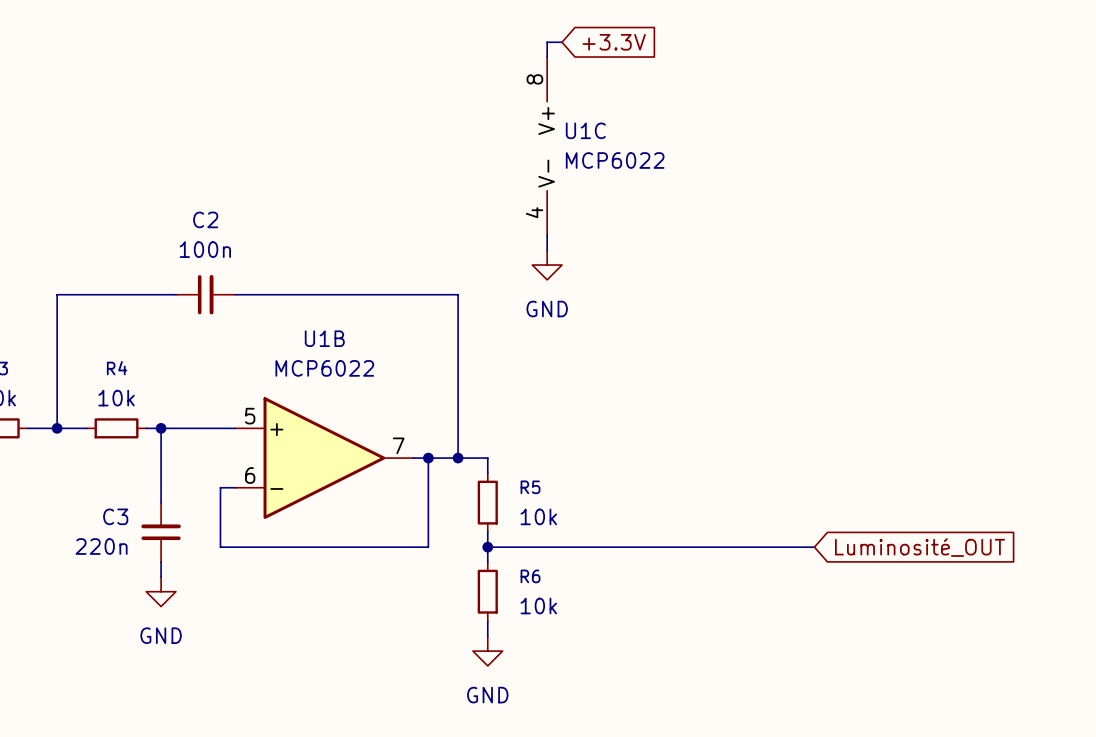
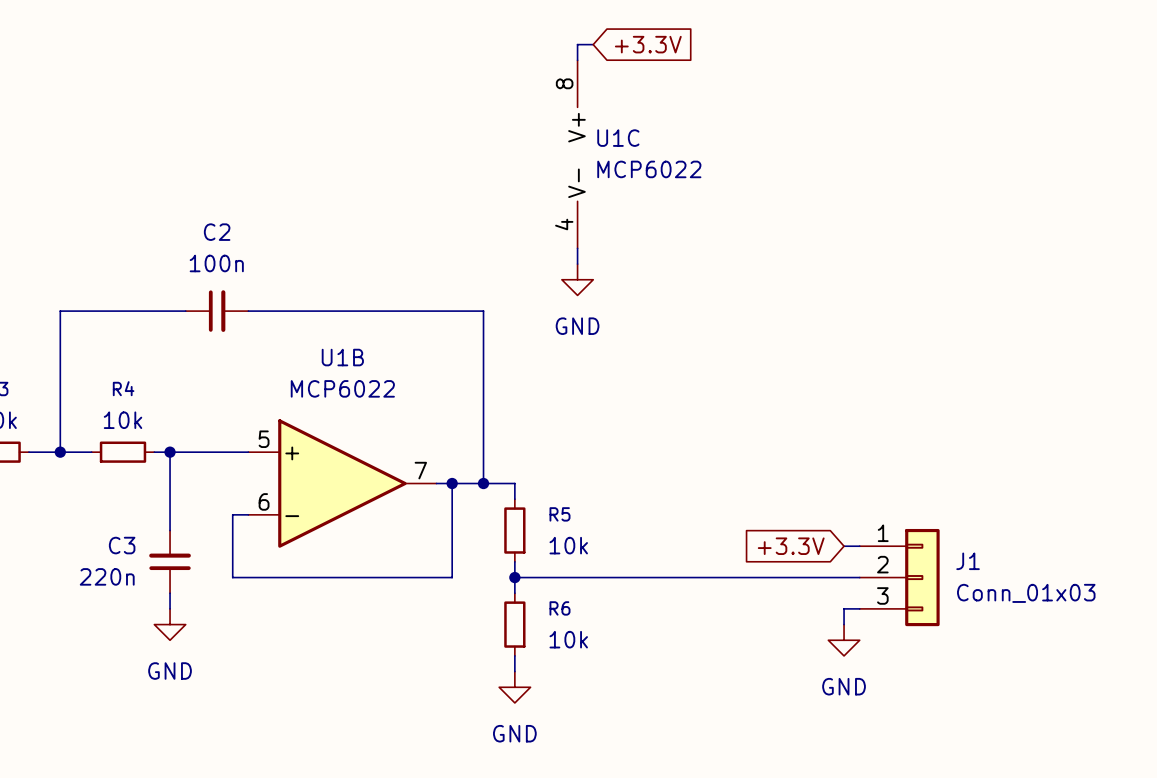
global label: none -> +3.3V (791, 546)
wire: none -> (844, 546) (859, 546)
J1: none -> Conn_01x03 (899, 577)
global label: Luminosité_OUT (920, 547) -> none
wire: none -> (859, 608) (844, 608) (844, 624)
power symbol: none -> GND (844, 640)

